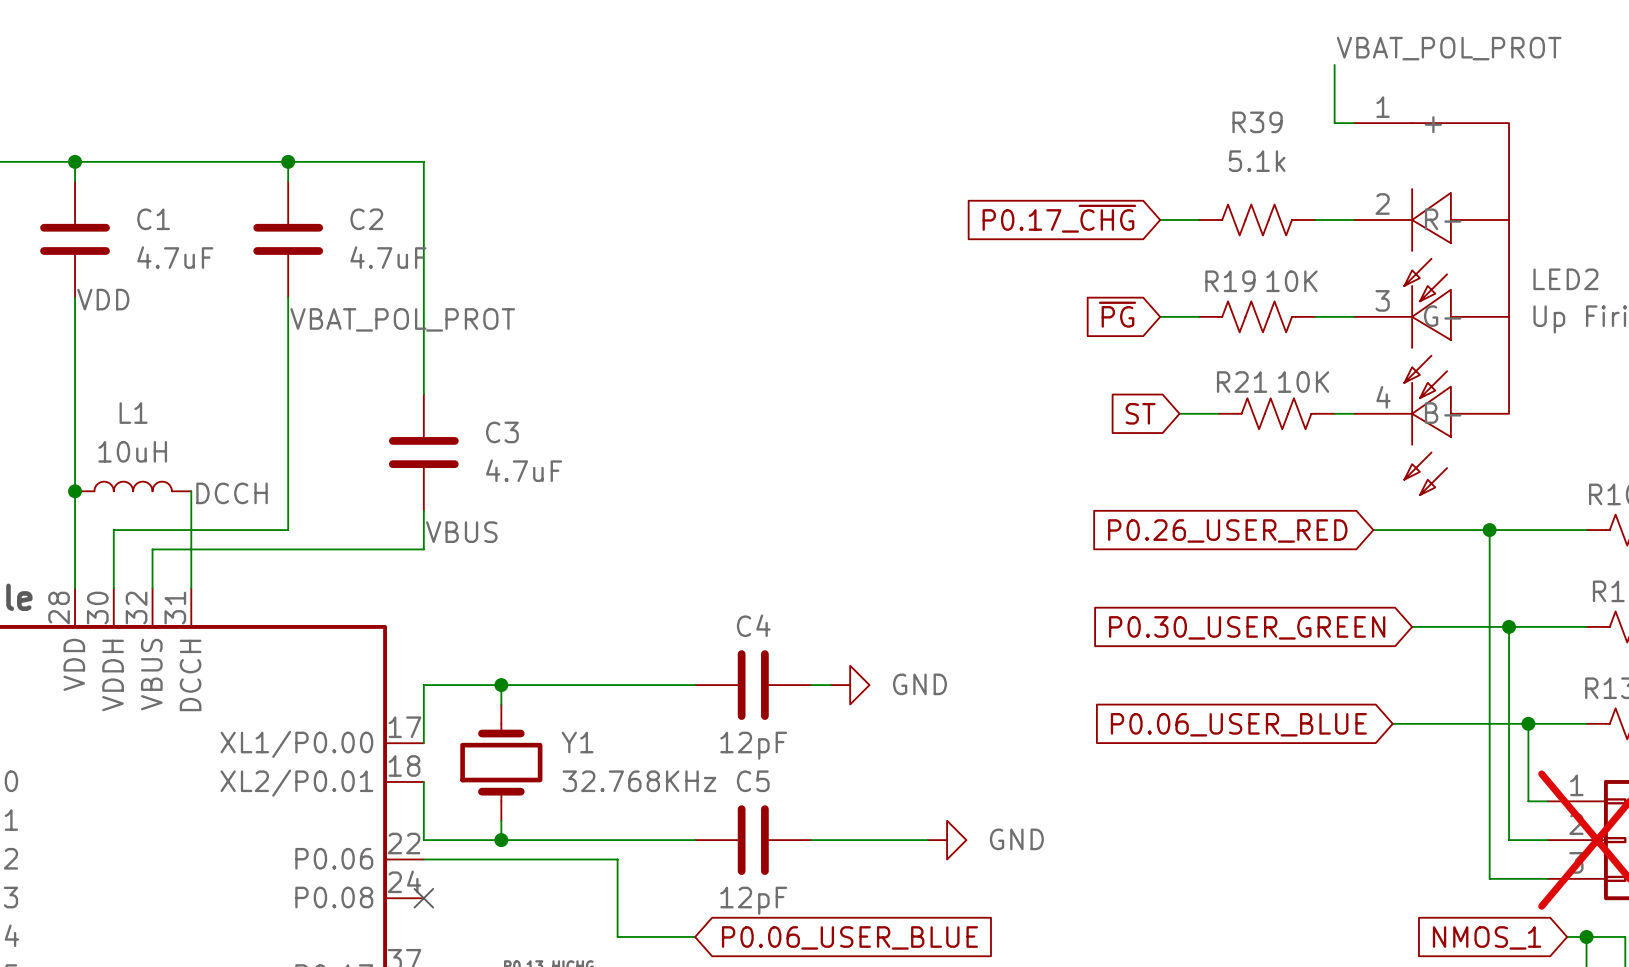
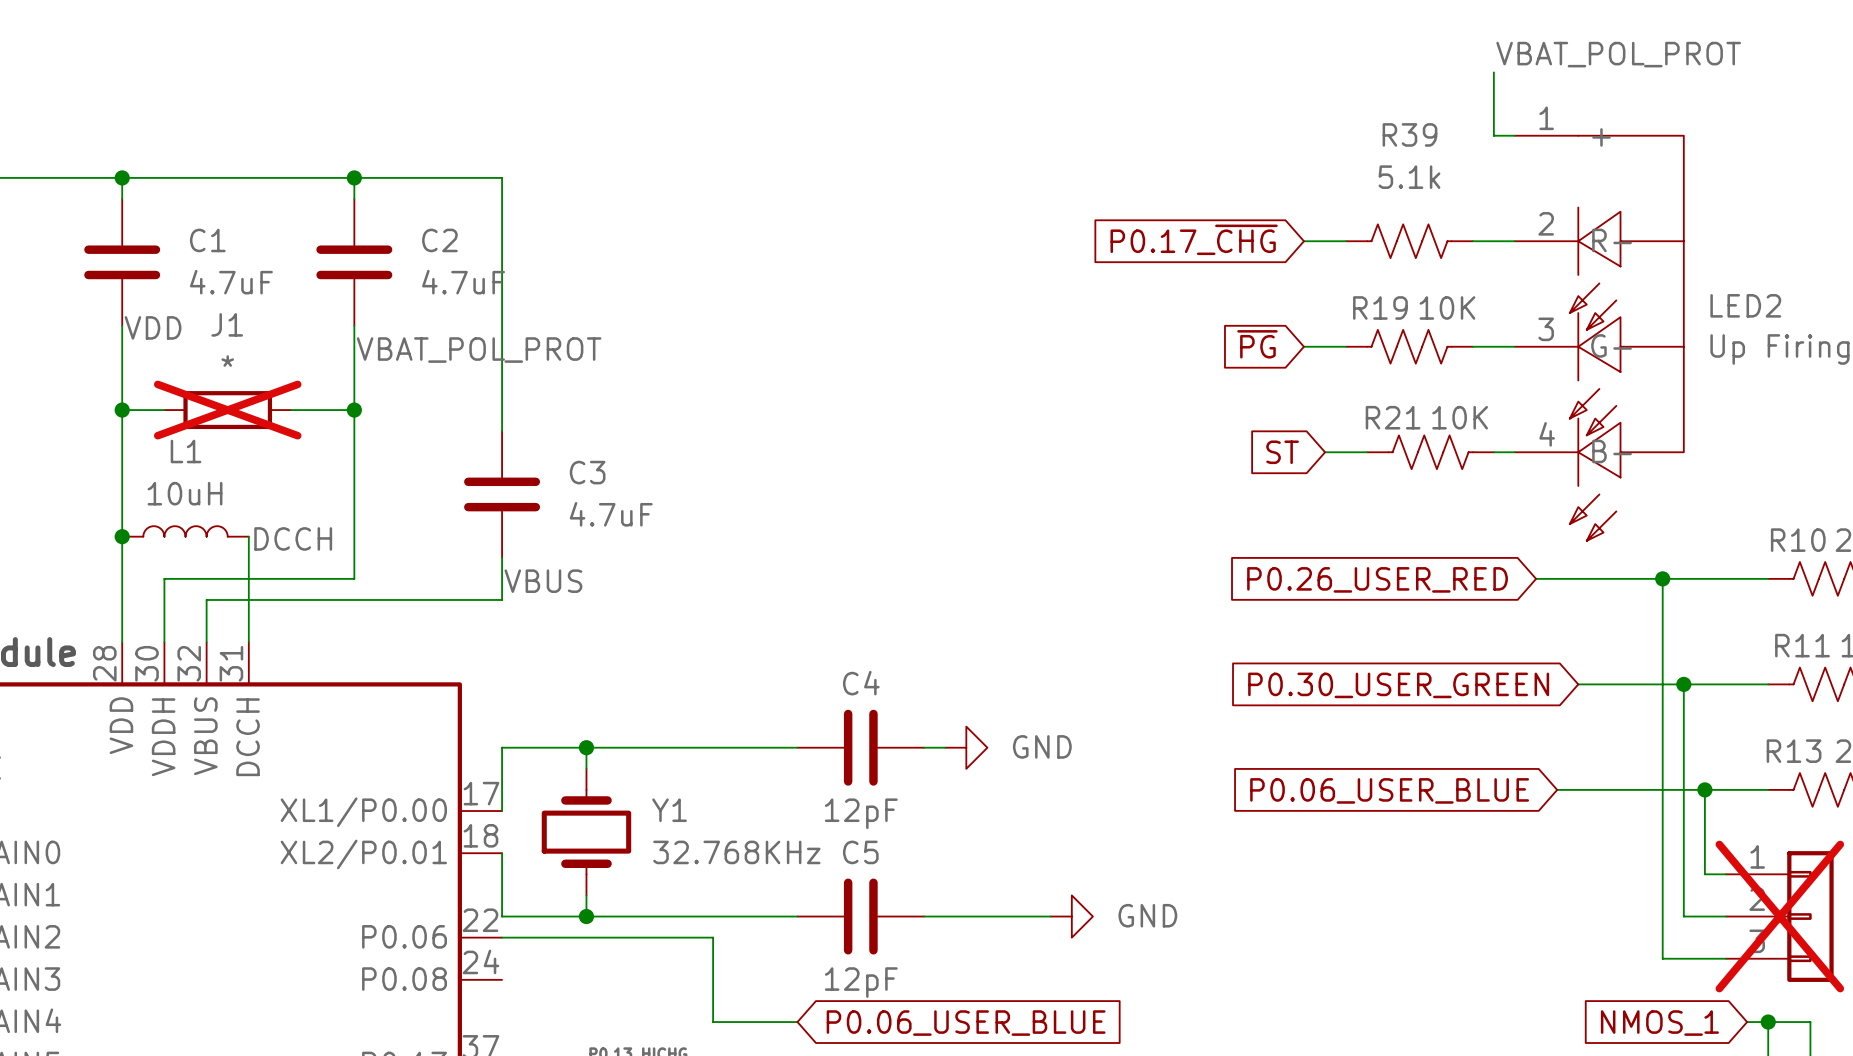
wire: none -> (122, 410) (164, 410)
junction: none -> (122, 410)
J1: none -> * (227, 410)
wire: none -> (291, 410) (354, 410)
junction: none -> (354, 410)
no-connect mark: (423, 898) -> none

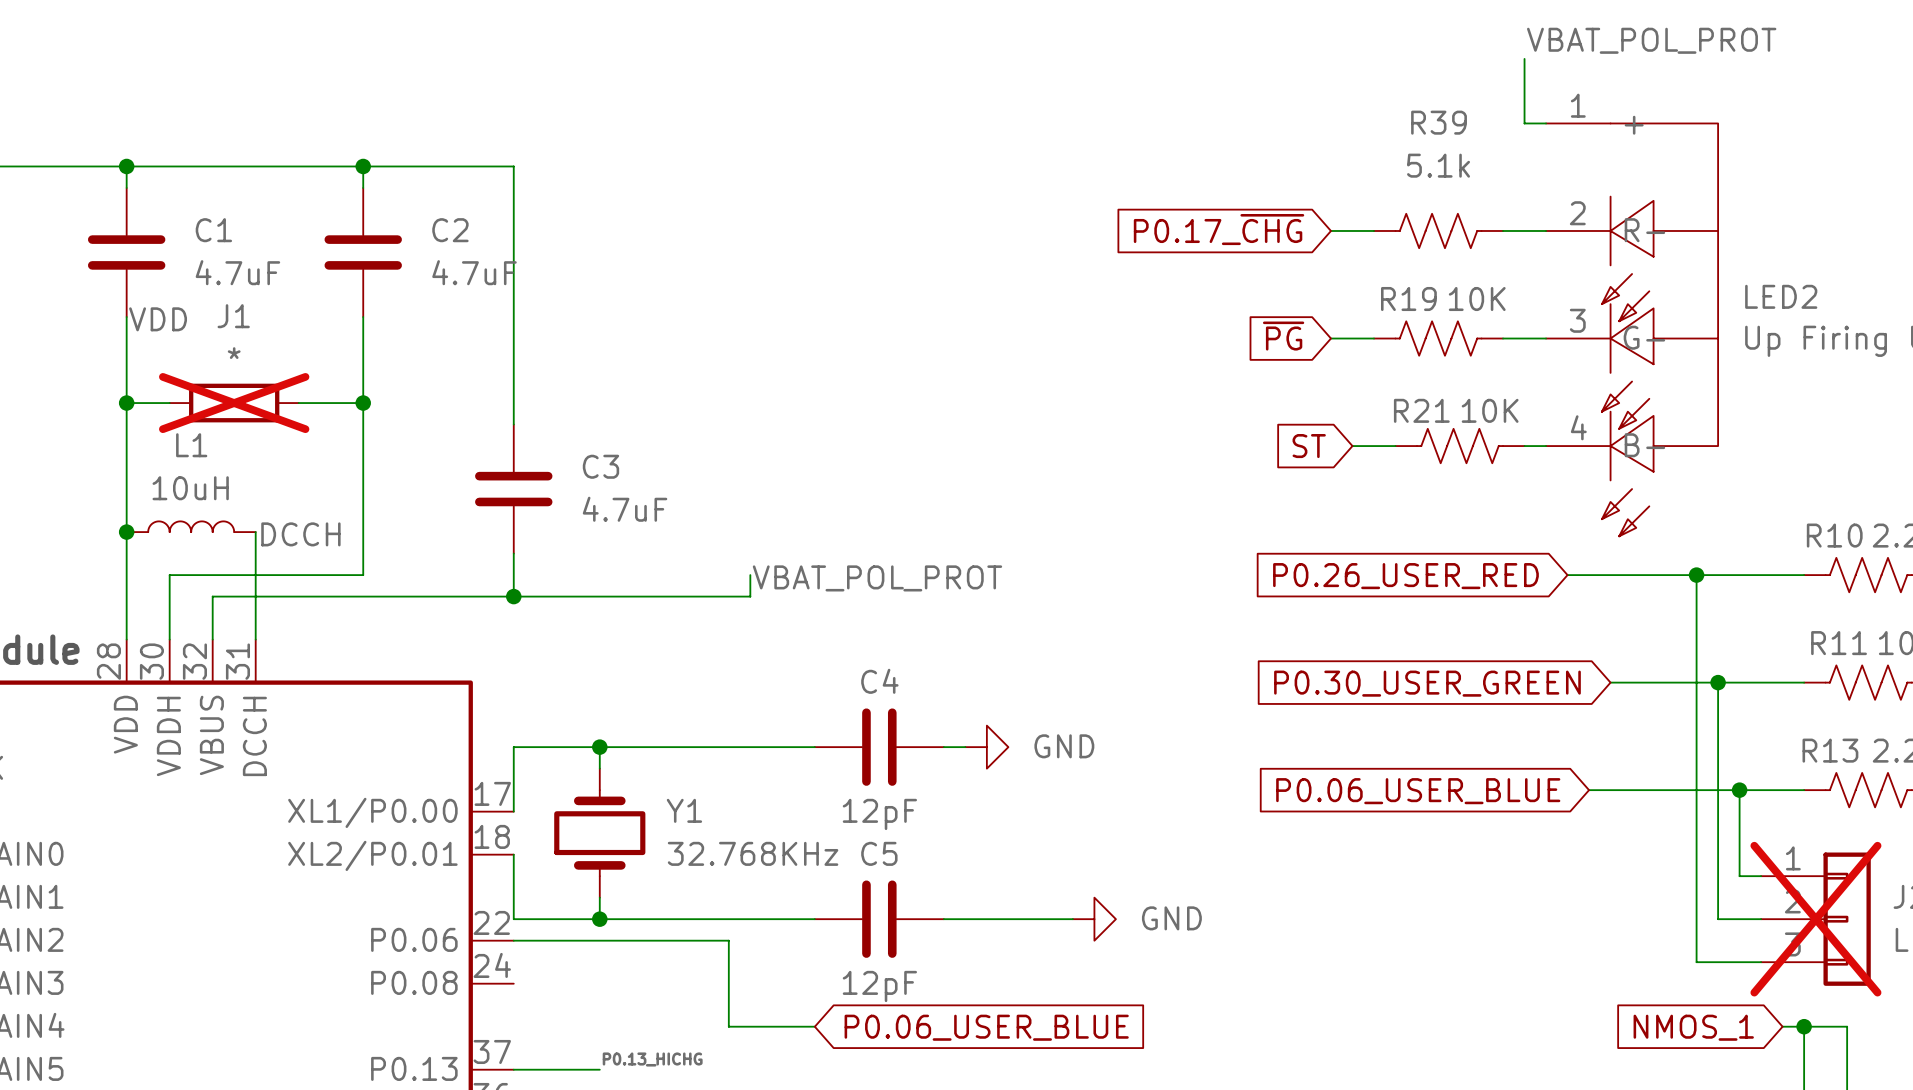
label: VBAT_POL_PROT (479, 350) -> none
wire: none -> (750, 575) (750, 596) (513, 596)
label: VBUS (543, 581) -> none
label: none -> VBAT_POL_PROT (877, 578)
junction: none -> (513, 596)

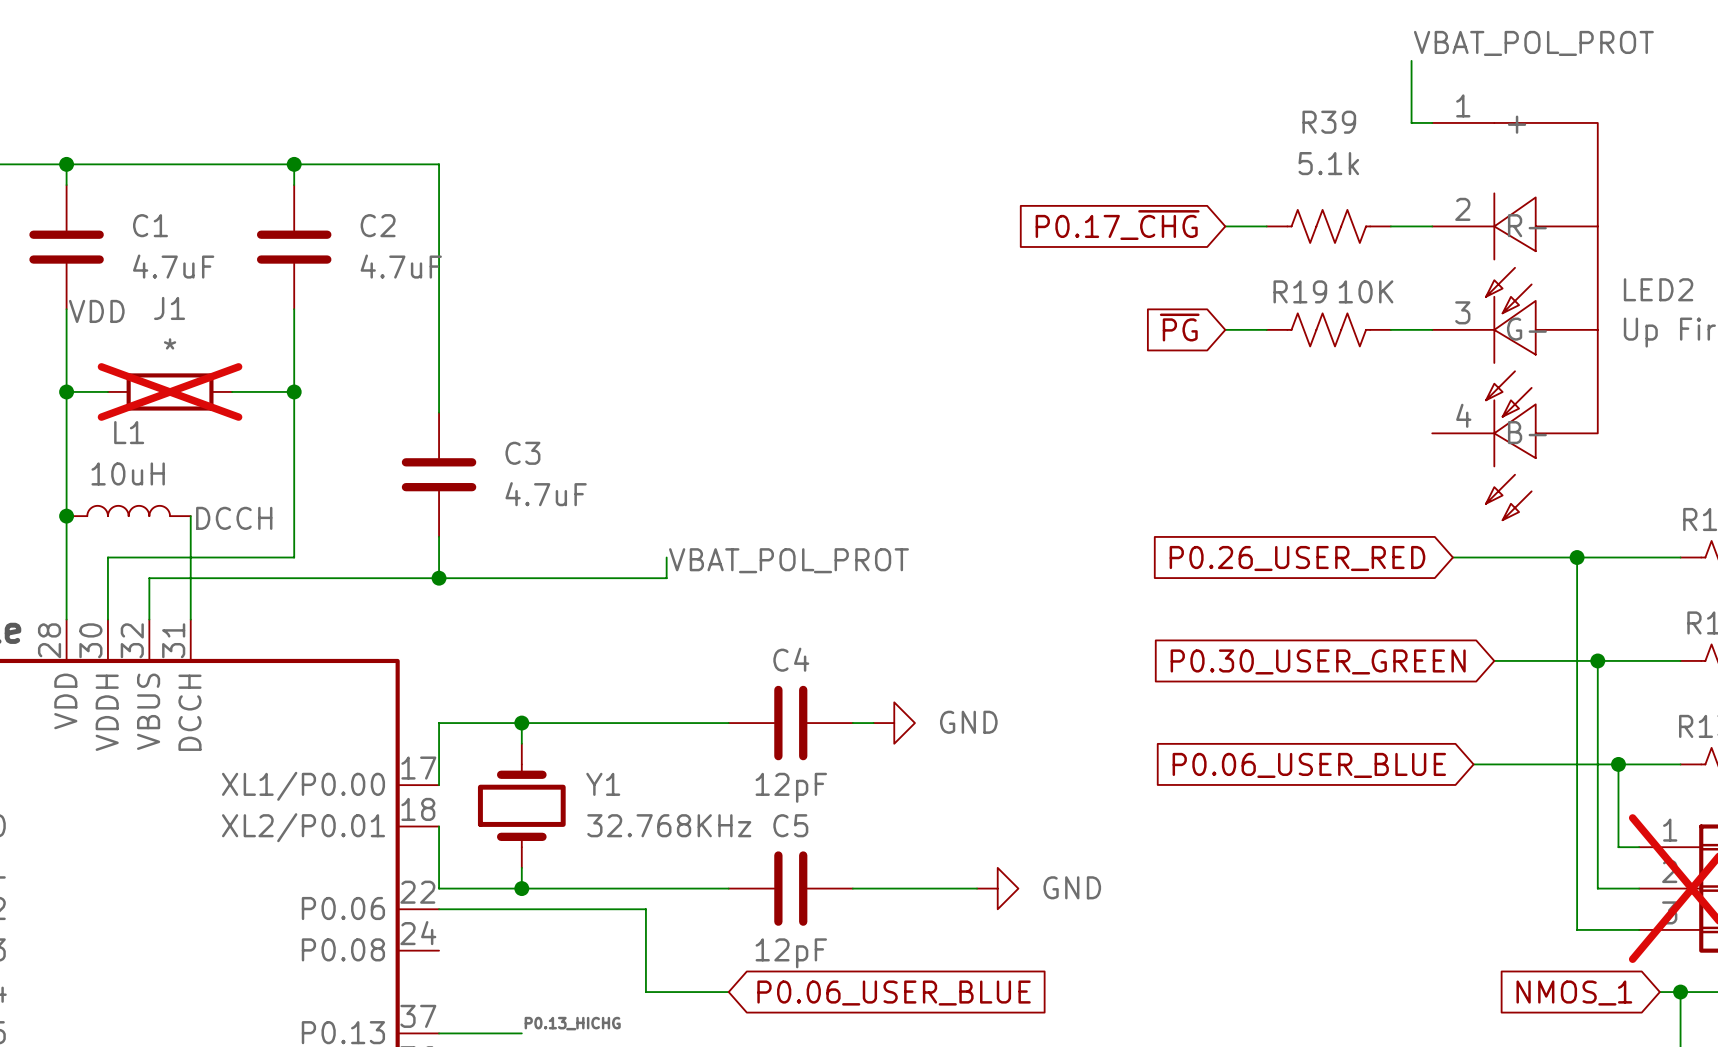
global label: ST (1309, 446) -> none
wire: (1352, 446) (1395, 446) -> none
R21: 10K (1460, 446) -> none
wire: (1524, 446) (1546, 446) -> none

